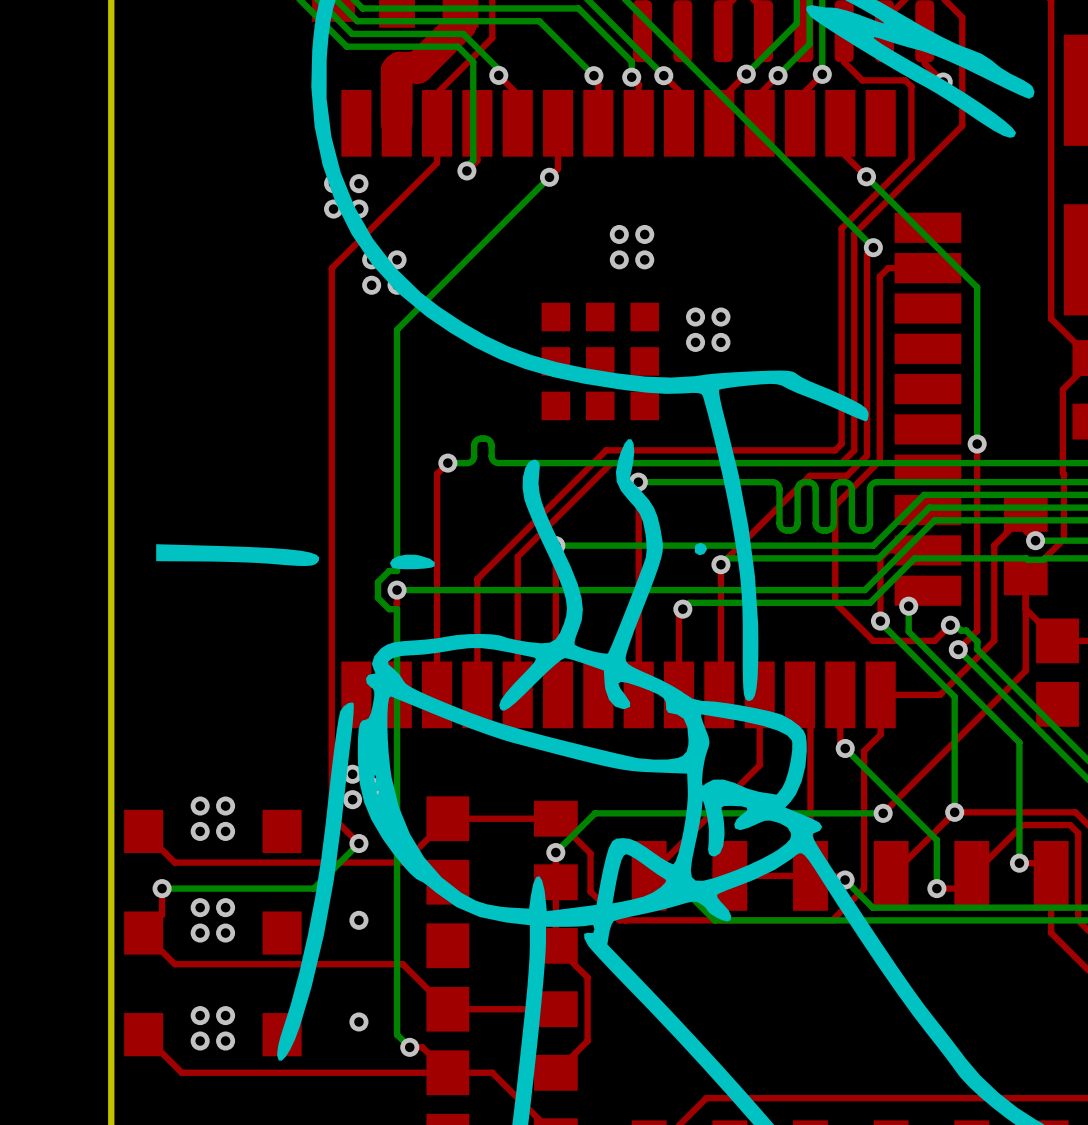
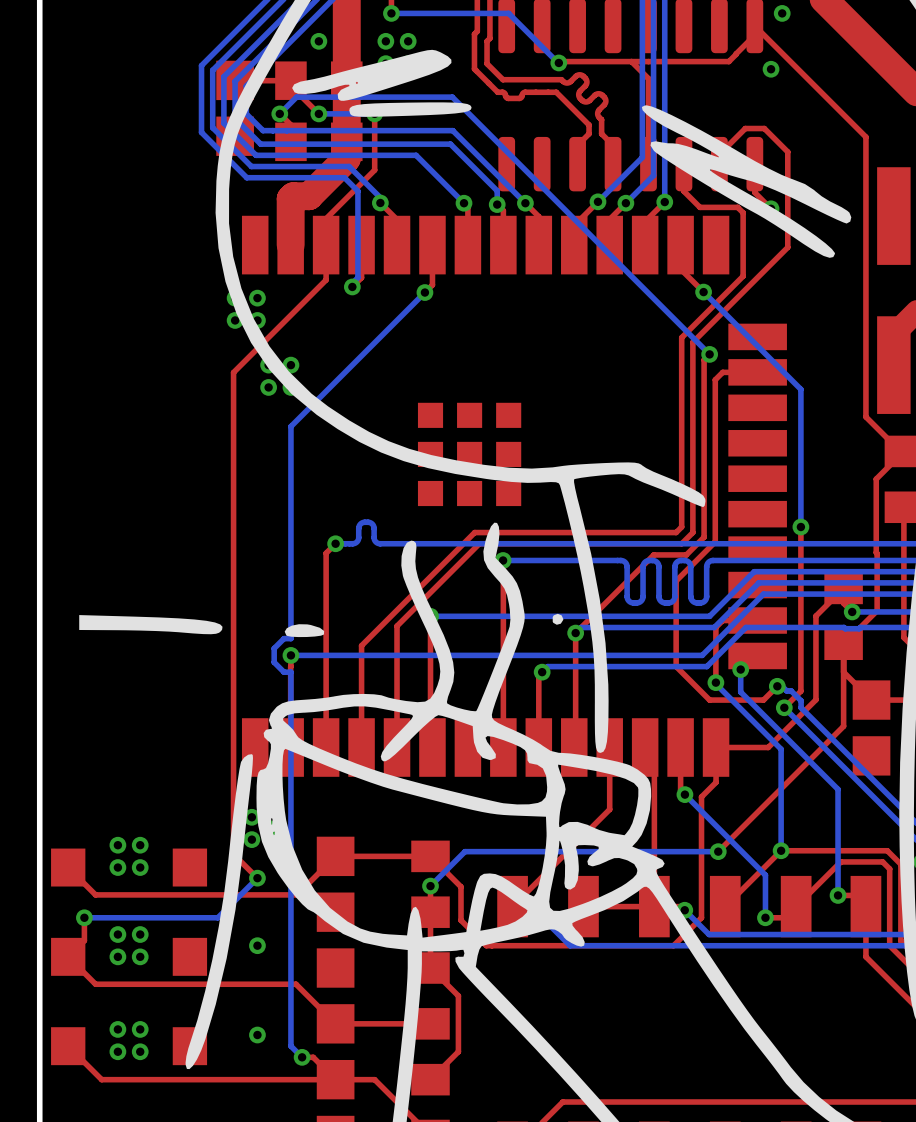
via: (619, 234) -> none
via: (644, 234) -> none
via: (619, 259) -> none
via: (644, 259) -> none
via: (695, 317) -> none
via: (720, 317) -> none
via: (695, 342) -> none
via: (720, 342) -> none

